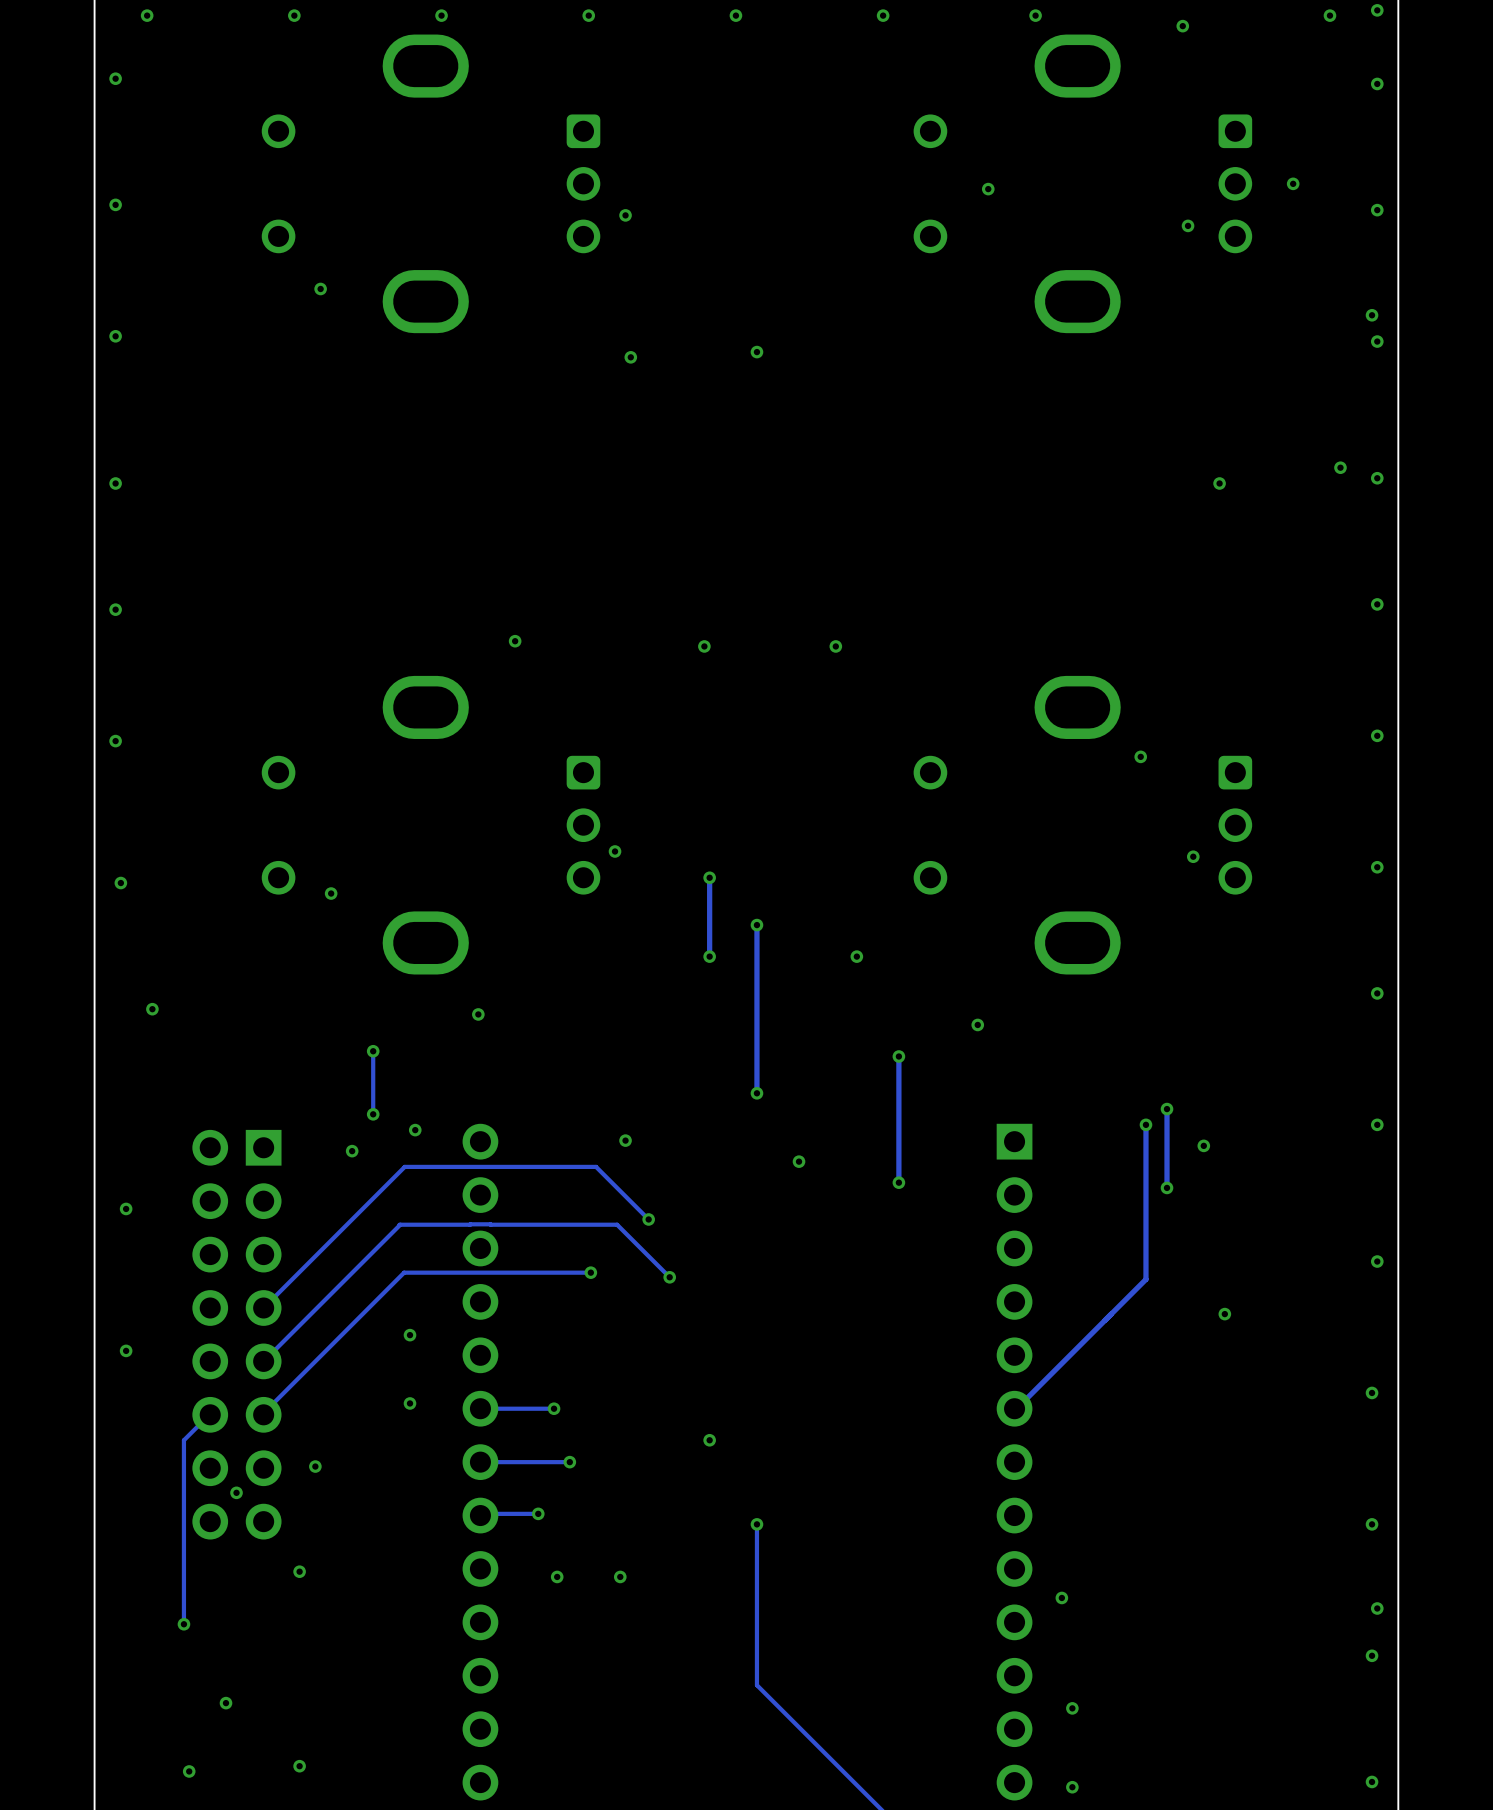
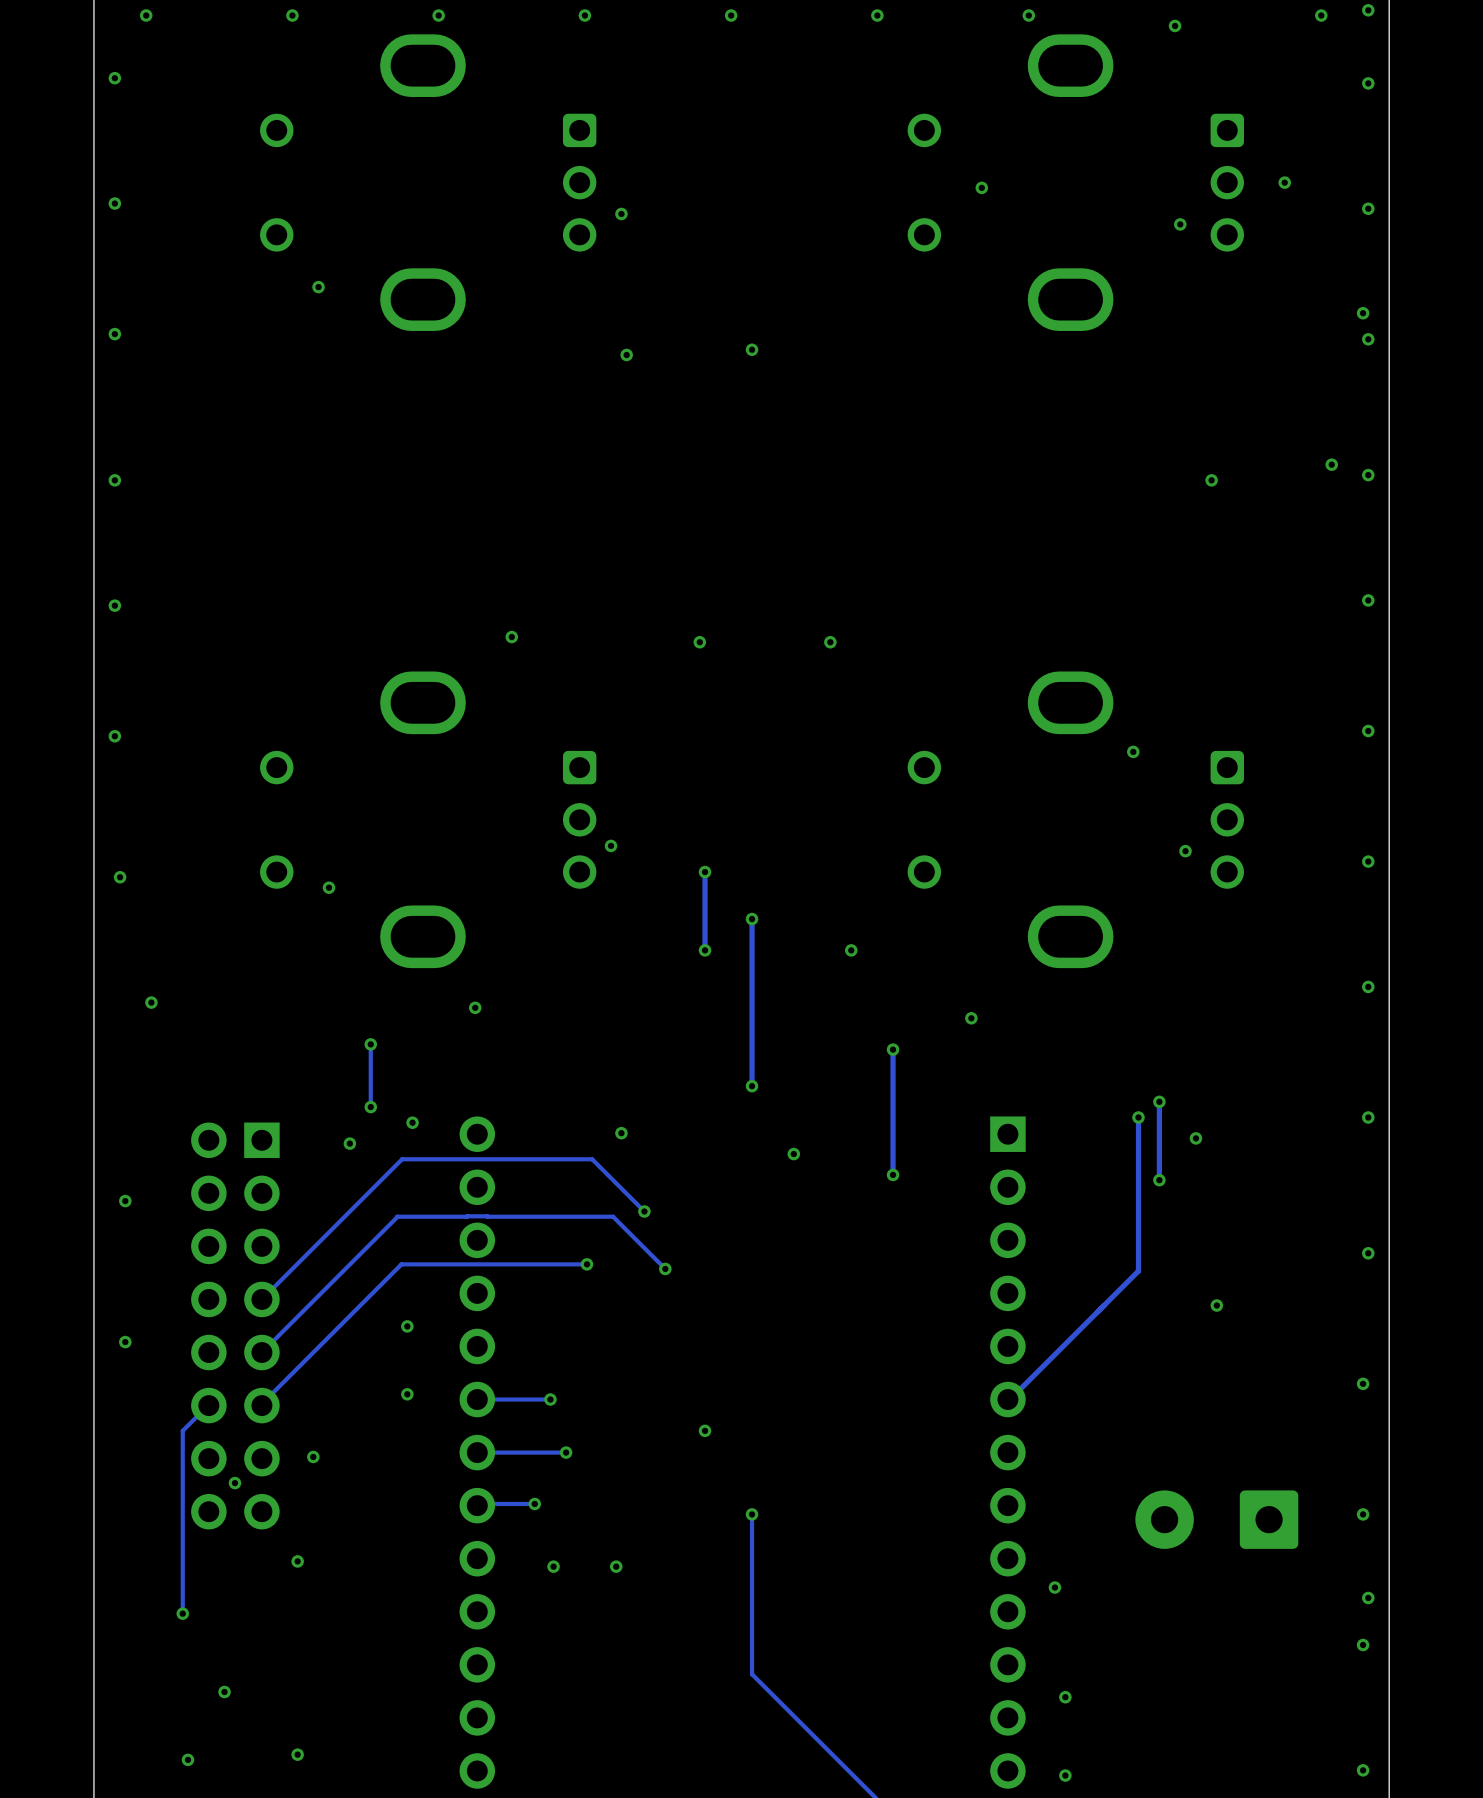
part: none -> (1216, 1519)

